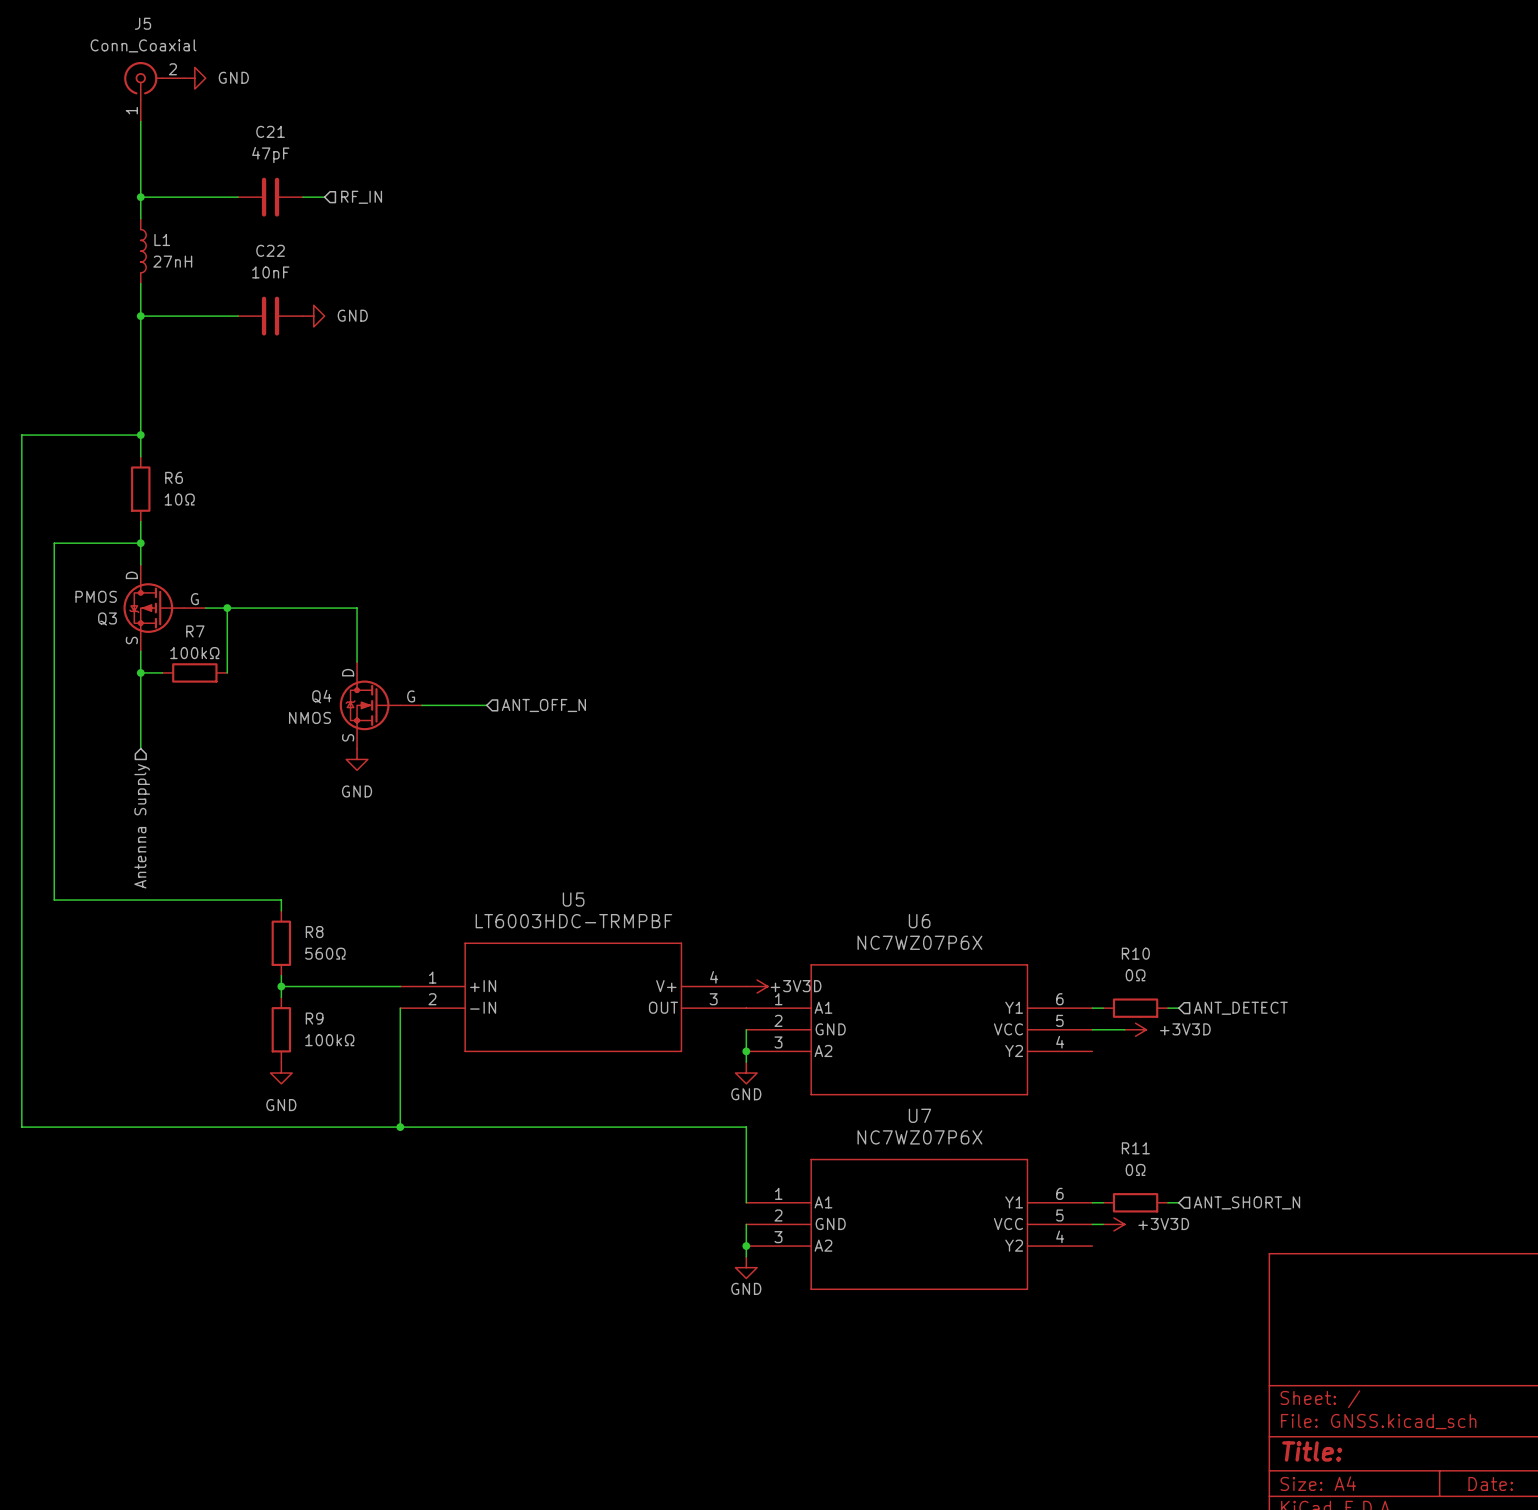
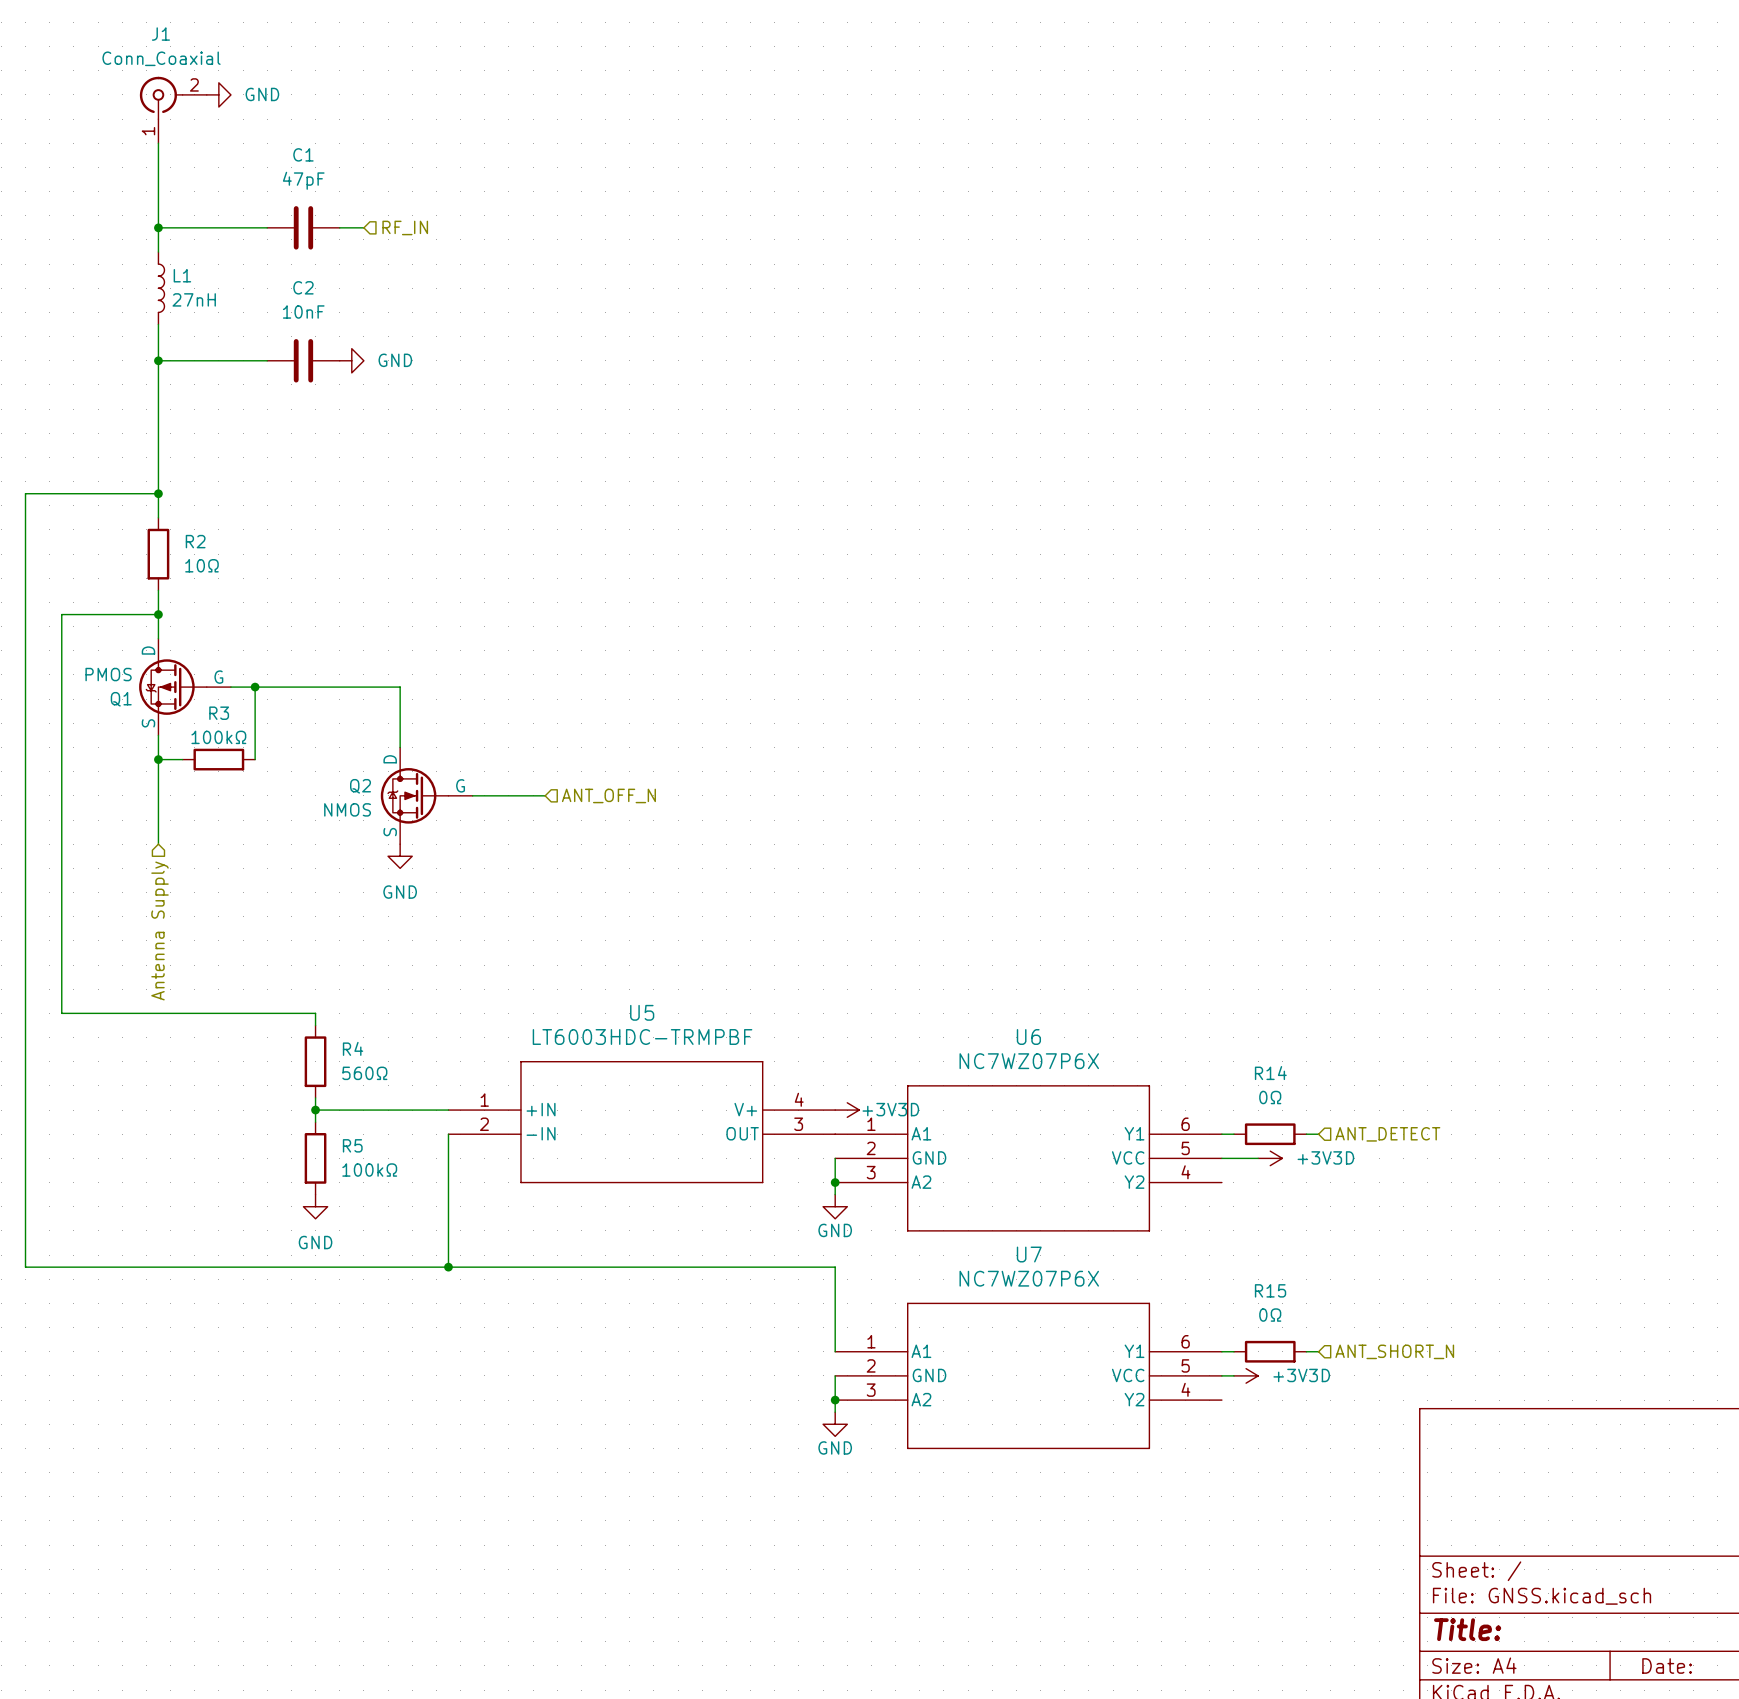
J5 name: J5 (143, 23) -> J1 (160, 34)
C21 name: C21 (270, 131) -> C1 (303, 154)
C22 name: C22 (270, 250) -> C2 (303, 287)
R6 name: R6 (174, 477) -> R2 (195, 541)
Q3 name: Q3 (107, 618) -> Q1 (121, 699)
R7 name: R7 (195, 631) -> R3 (219, 713)
Q4 name: Q4 (321, 696) -> Q2 (360, 786)
R8 name: R8 (314, 932) -> R4 (353, 1048)
R10 name: R10 (1135, 953) -> R14 (1270, 1073)
R9 name: R9 (314, 1018) -> R5 (352, 1145)
R11 name: R11 (1135, 1148) -> R15 (1270, 1290)

